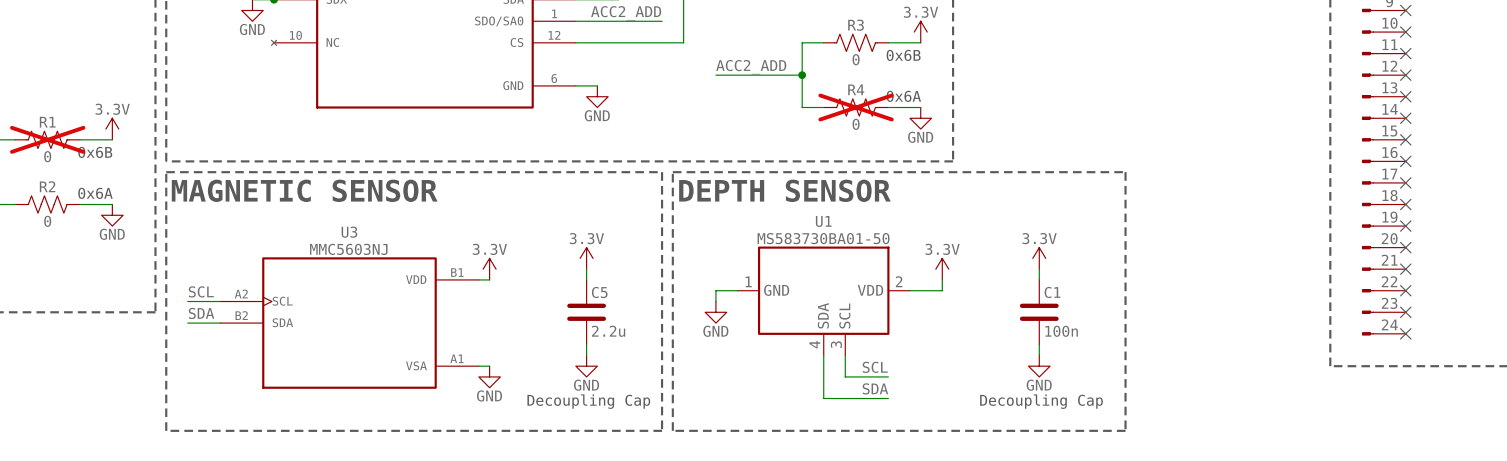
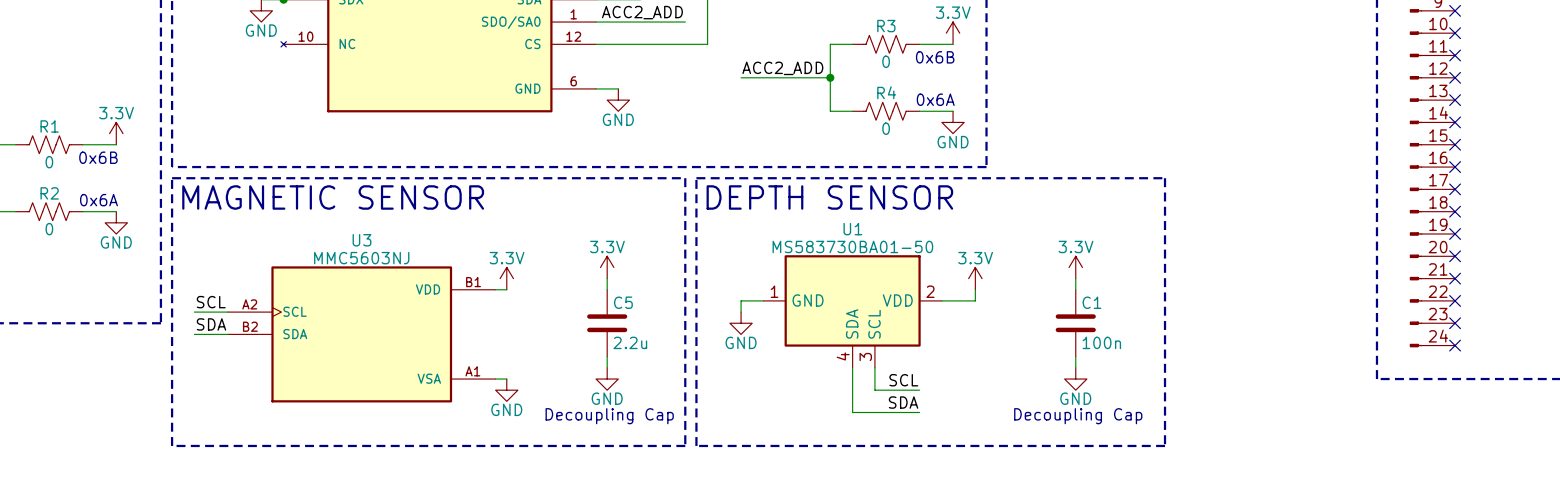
R4 do-not-place cross: (856, 107) -> none
R1 do-not-place cross: (47, 139) -> none

